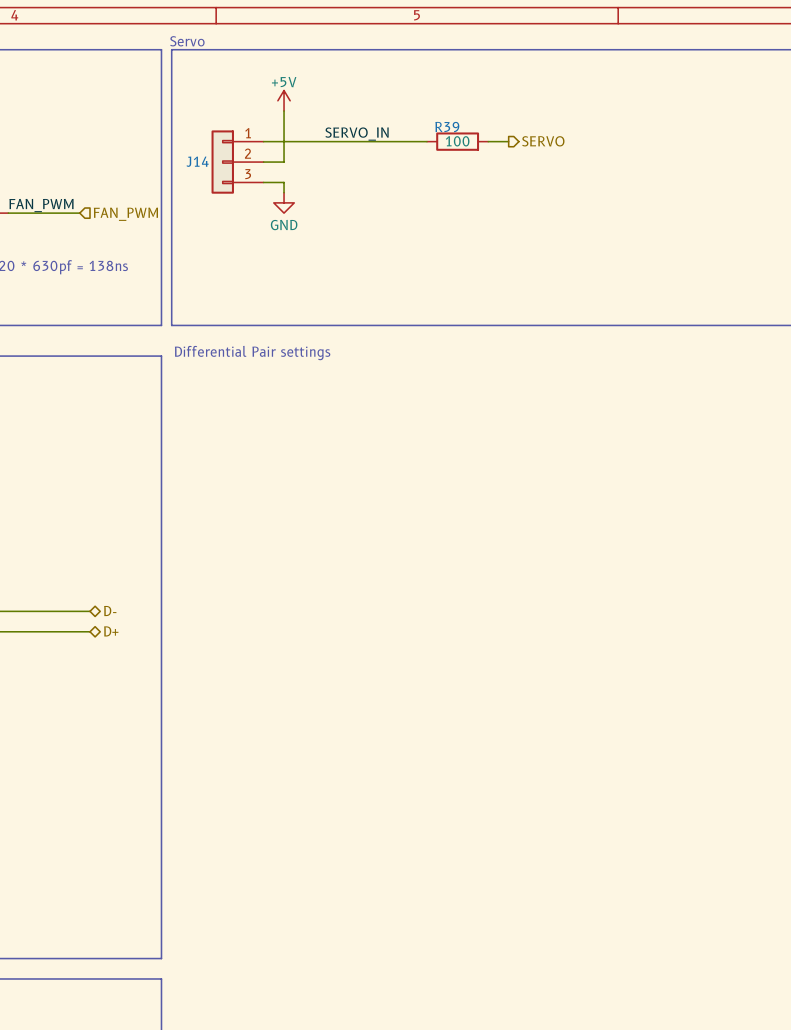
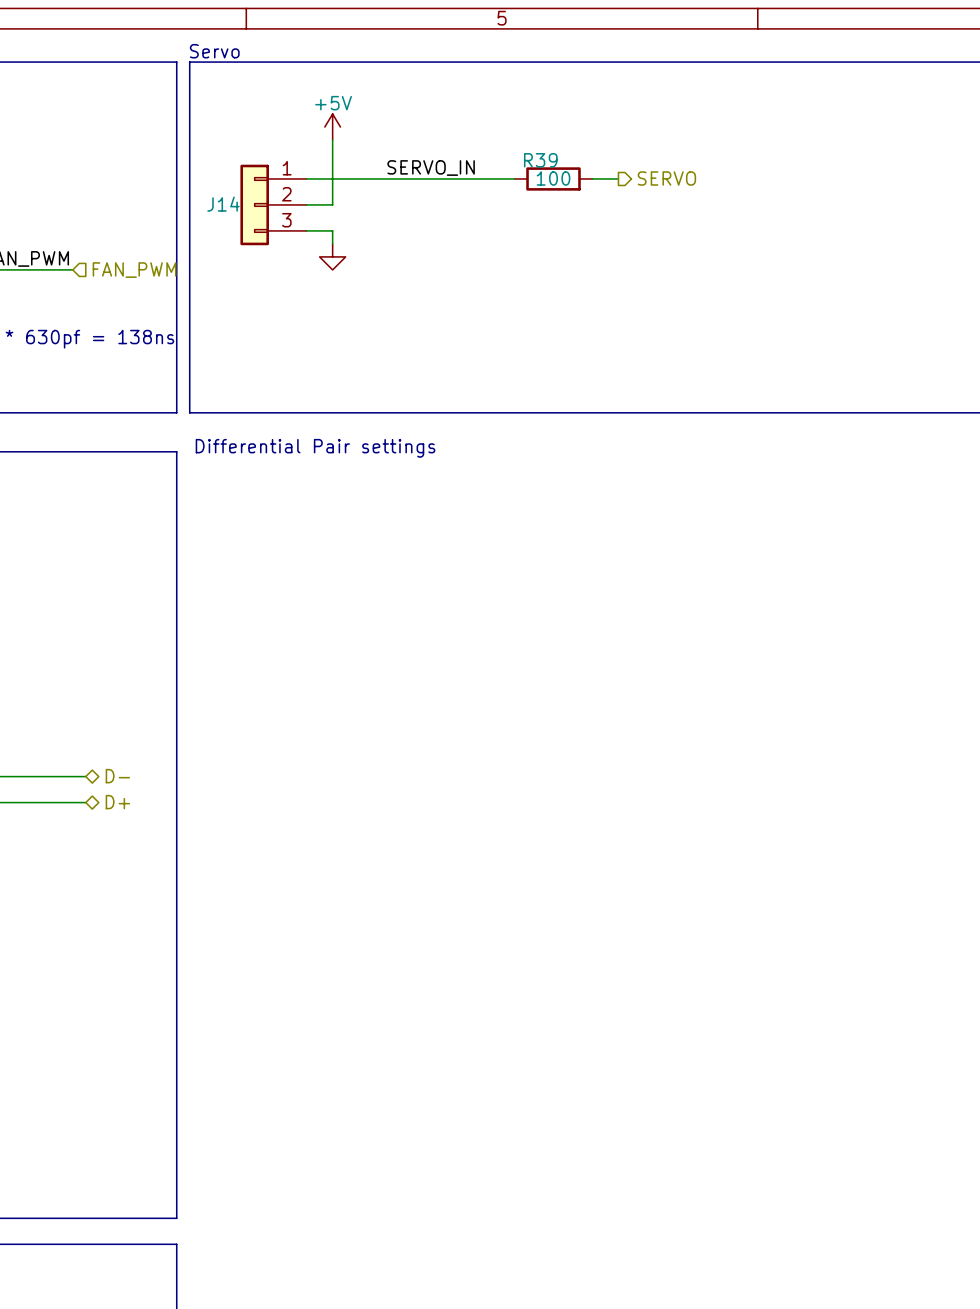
power symbol text: GND (284, 225) -> none

